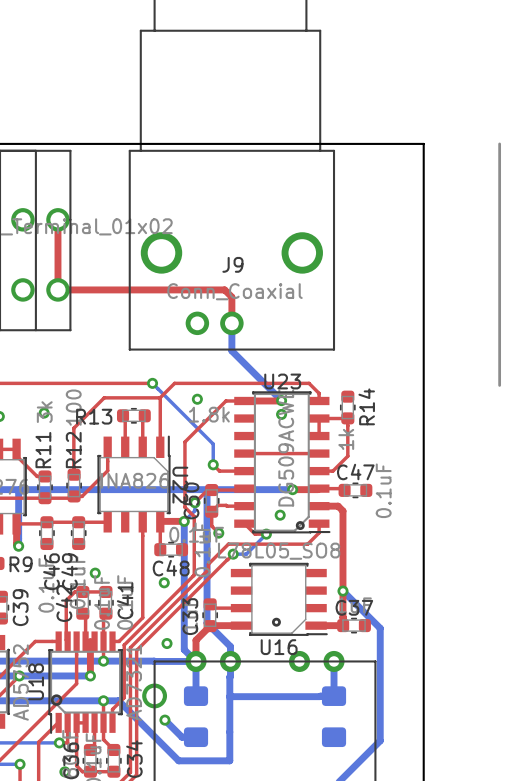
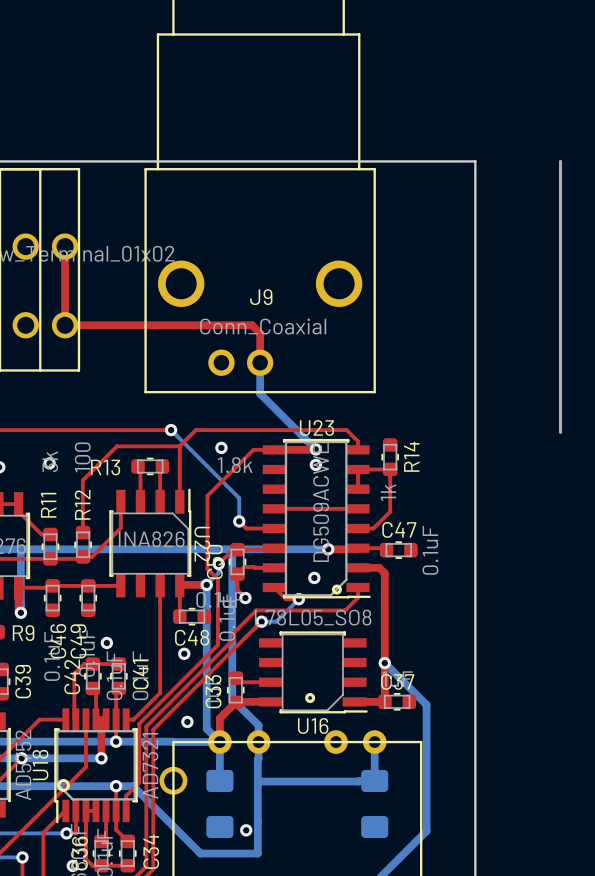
bottom track: (164, 720) (182, 737) (196, 737) -> none
via position: (164, 720) -> (246, 830)

